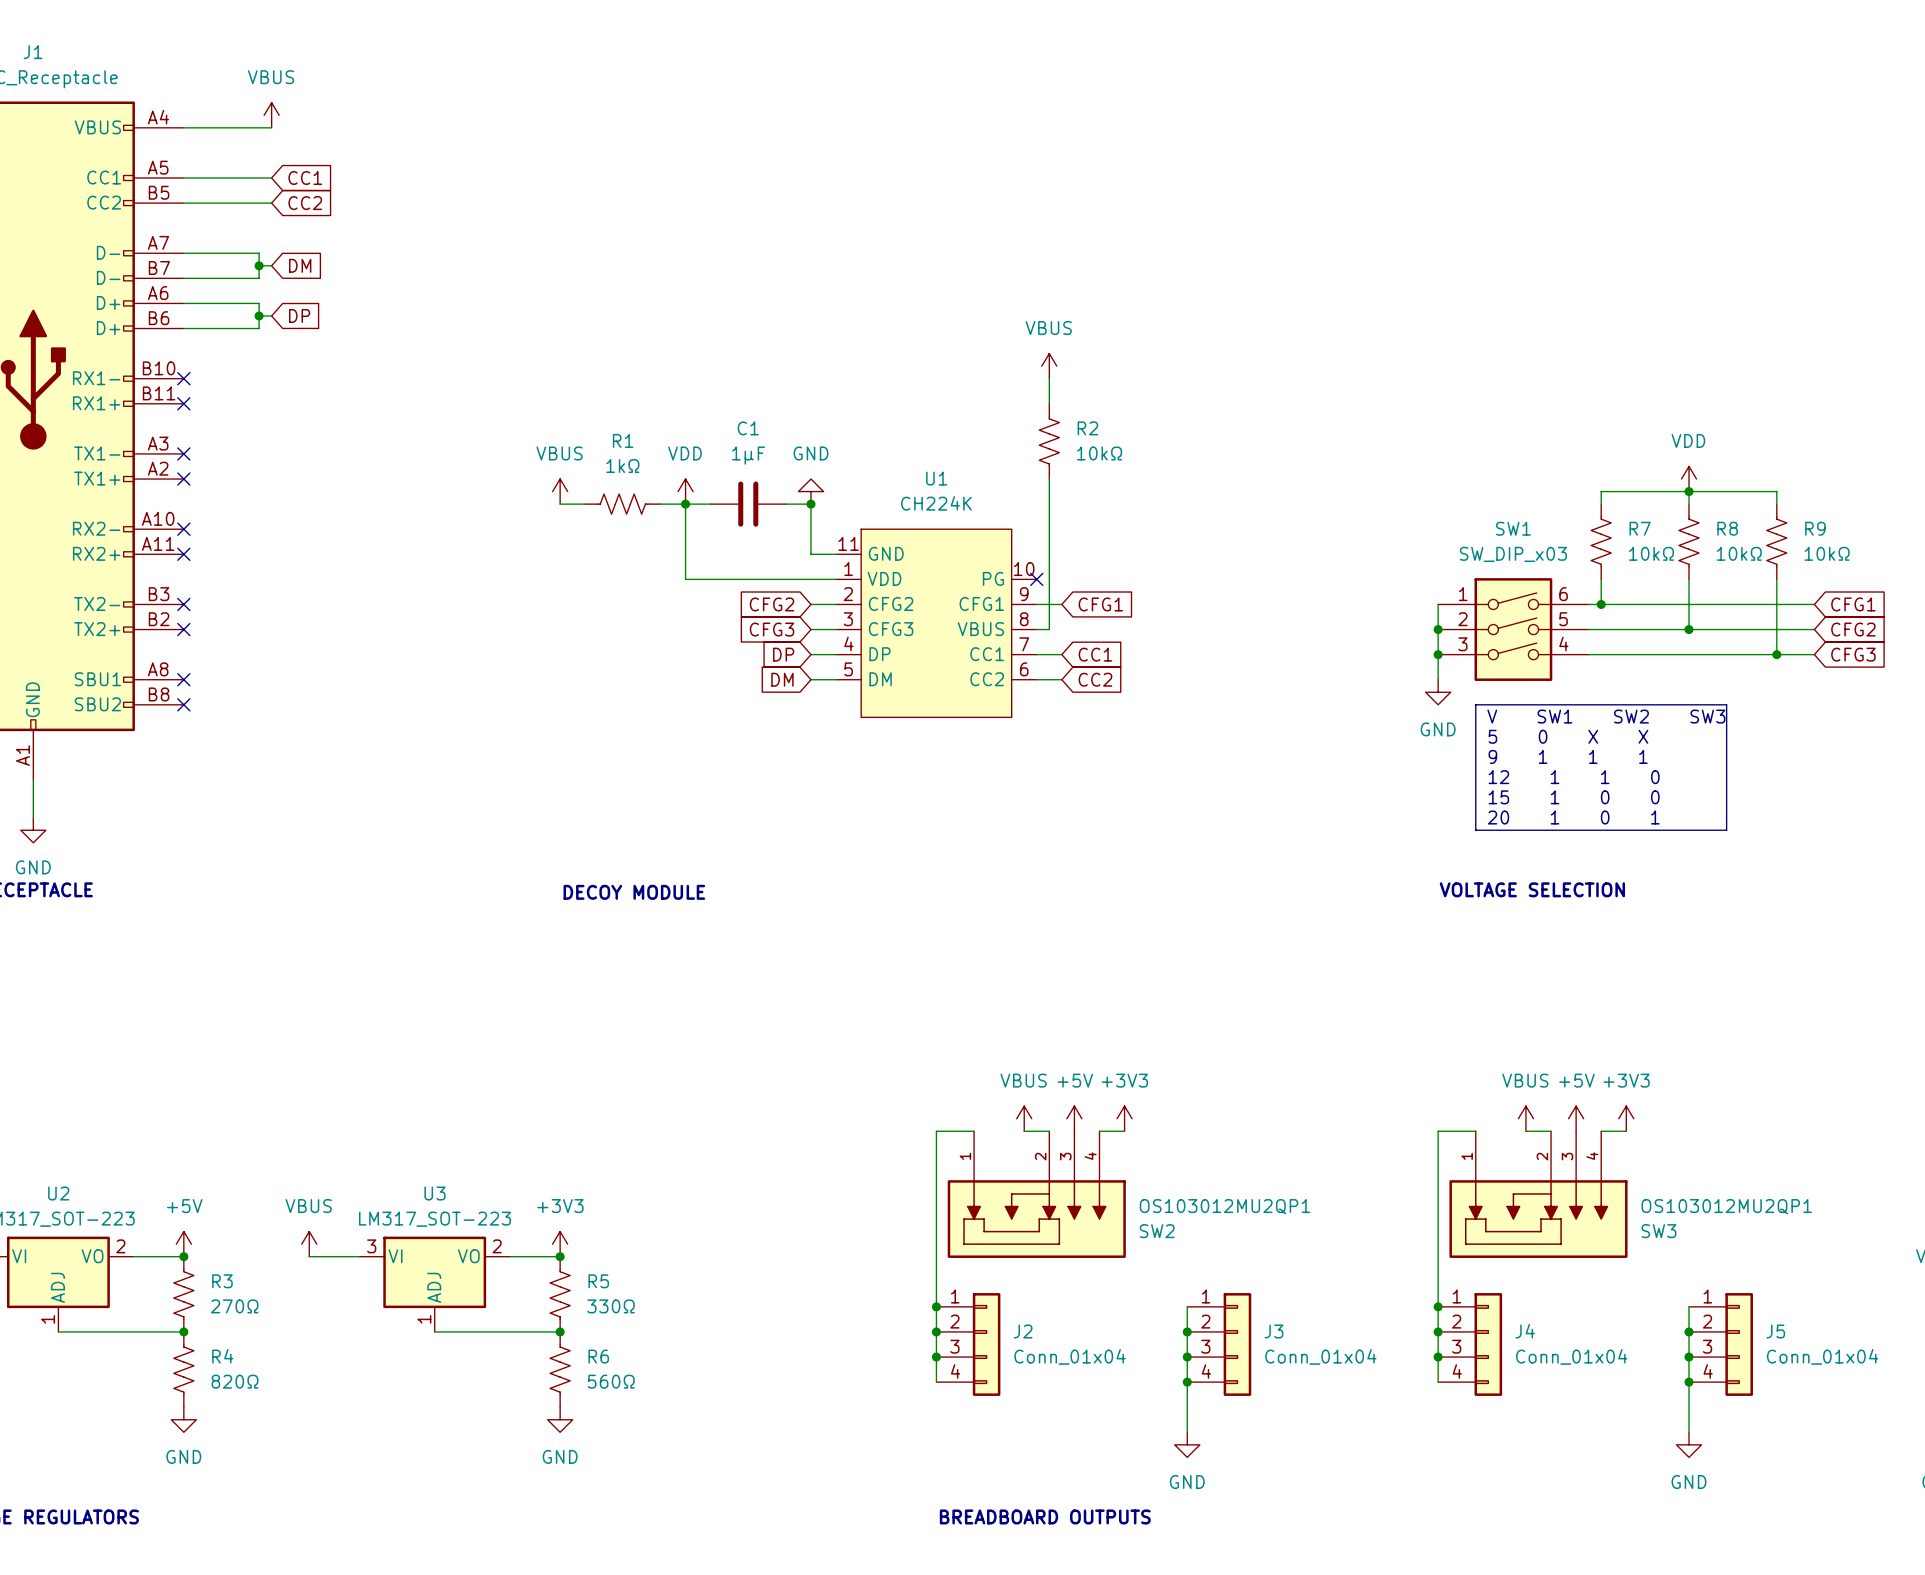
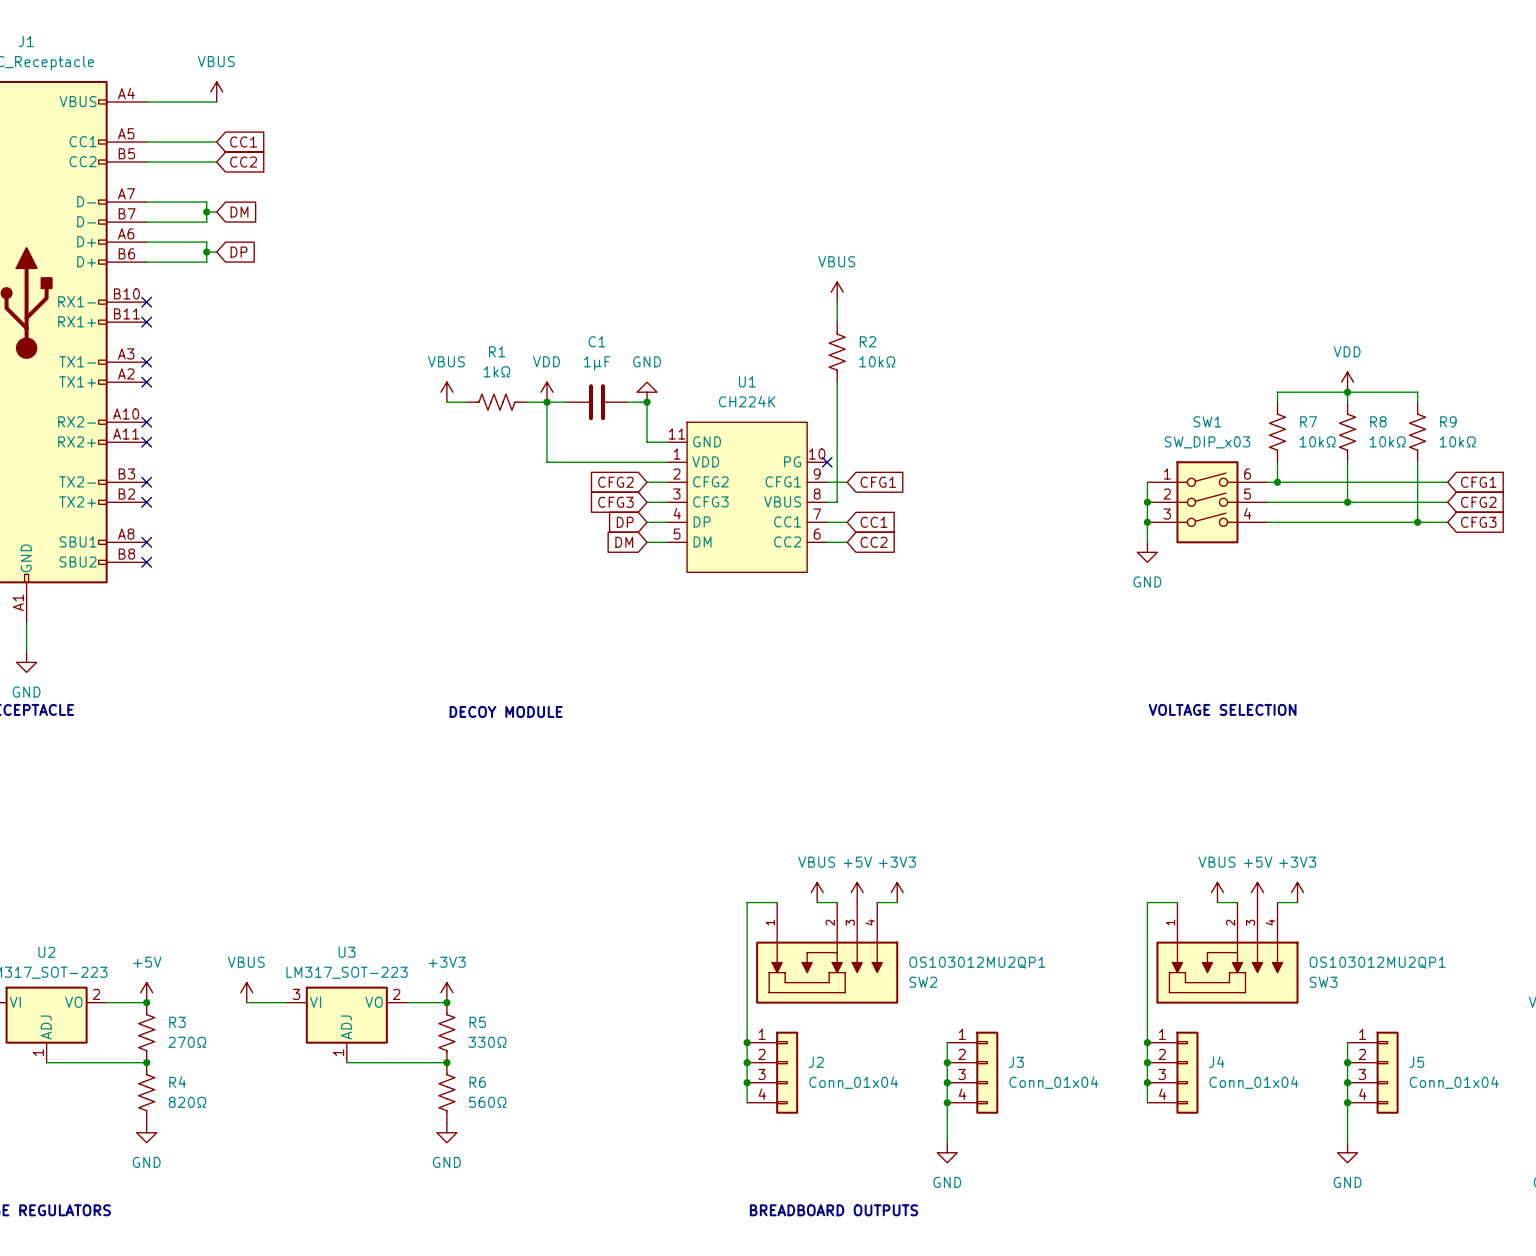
line: (1475, 704) (1726, 704) (1726, 830) (1475, 830) (1475, 704) -> none
text: V SW1 SW2 SW3 (1606, 716) -> none
text: 5 0 X X (1568, 736) -> none
text: 9 1 1 1 (1568, 756) -> none
text: 12 1 1 0 (1574, 777) -> none
text: 15 1 0 0 (1574, 797) -> none
text: 20 1 0 1 (1573, 817) -> none

